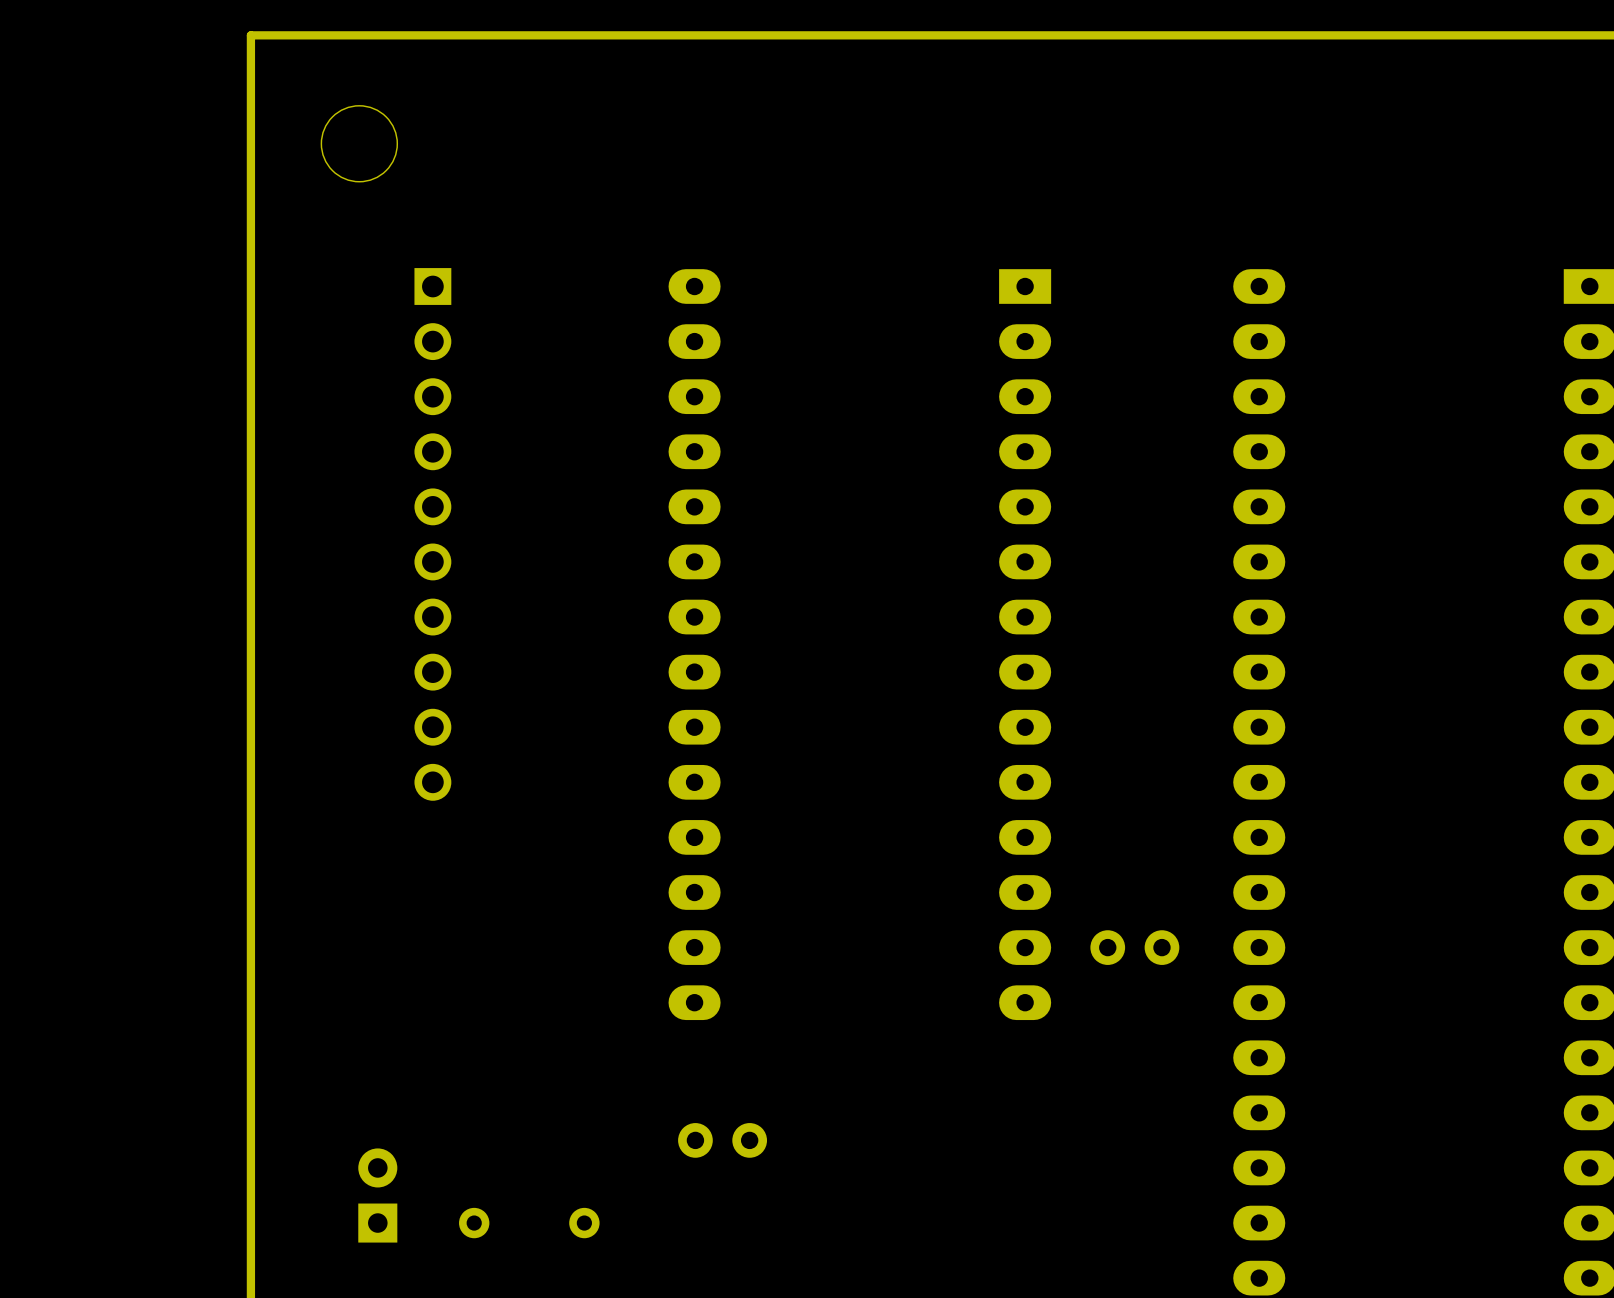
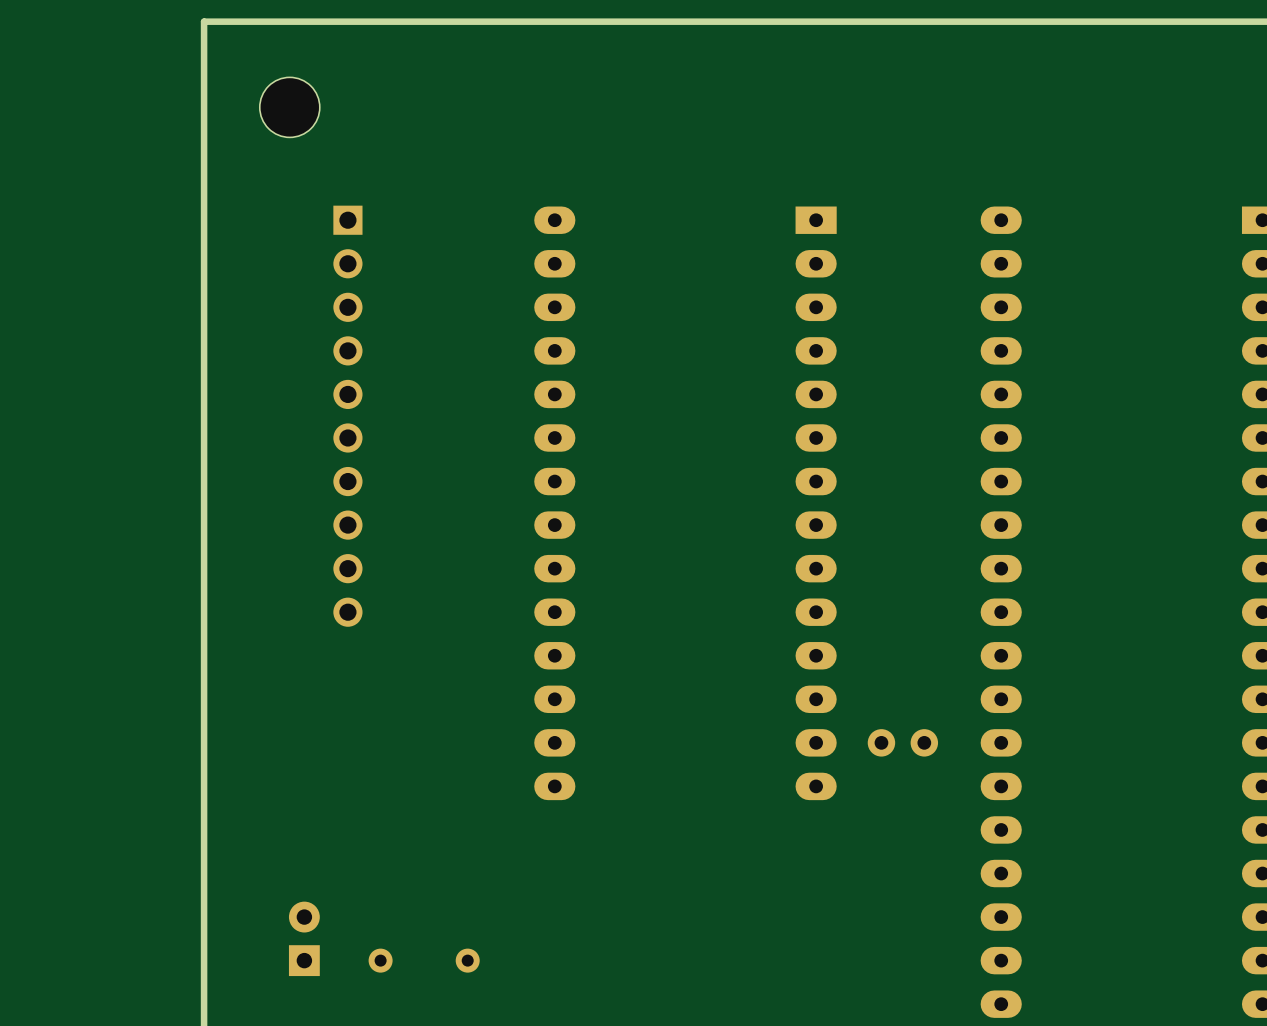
part: (722, 1140) -> none

